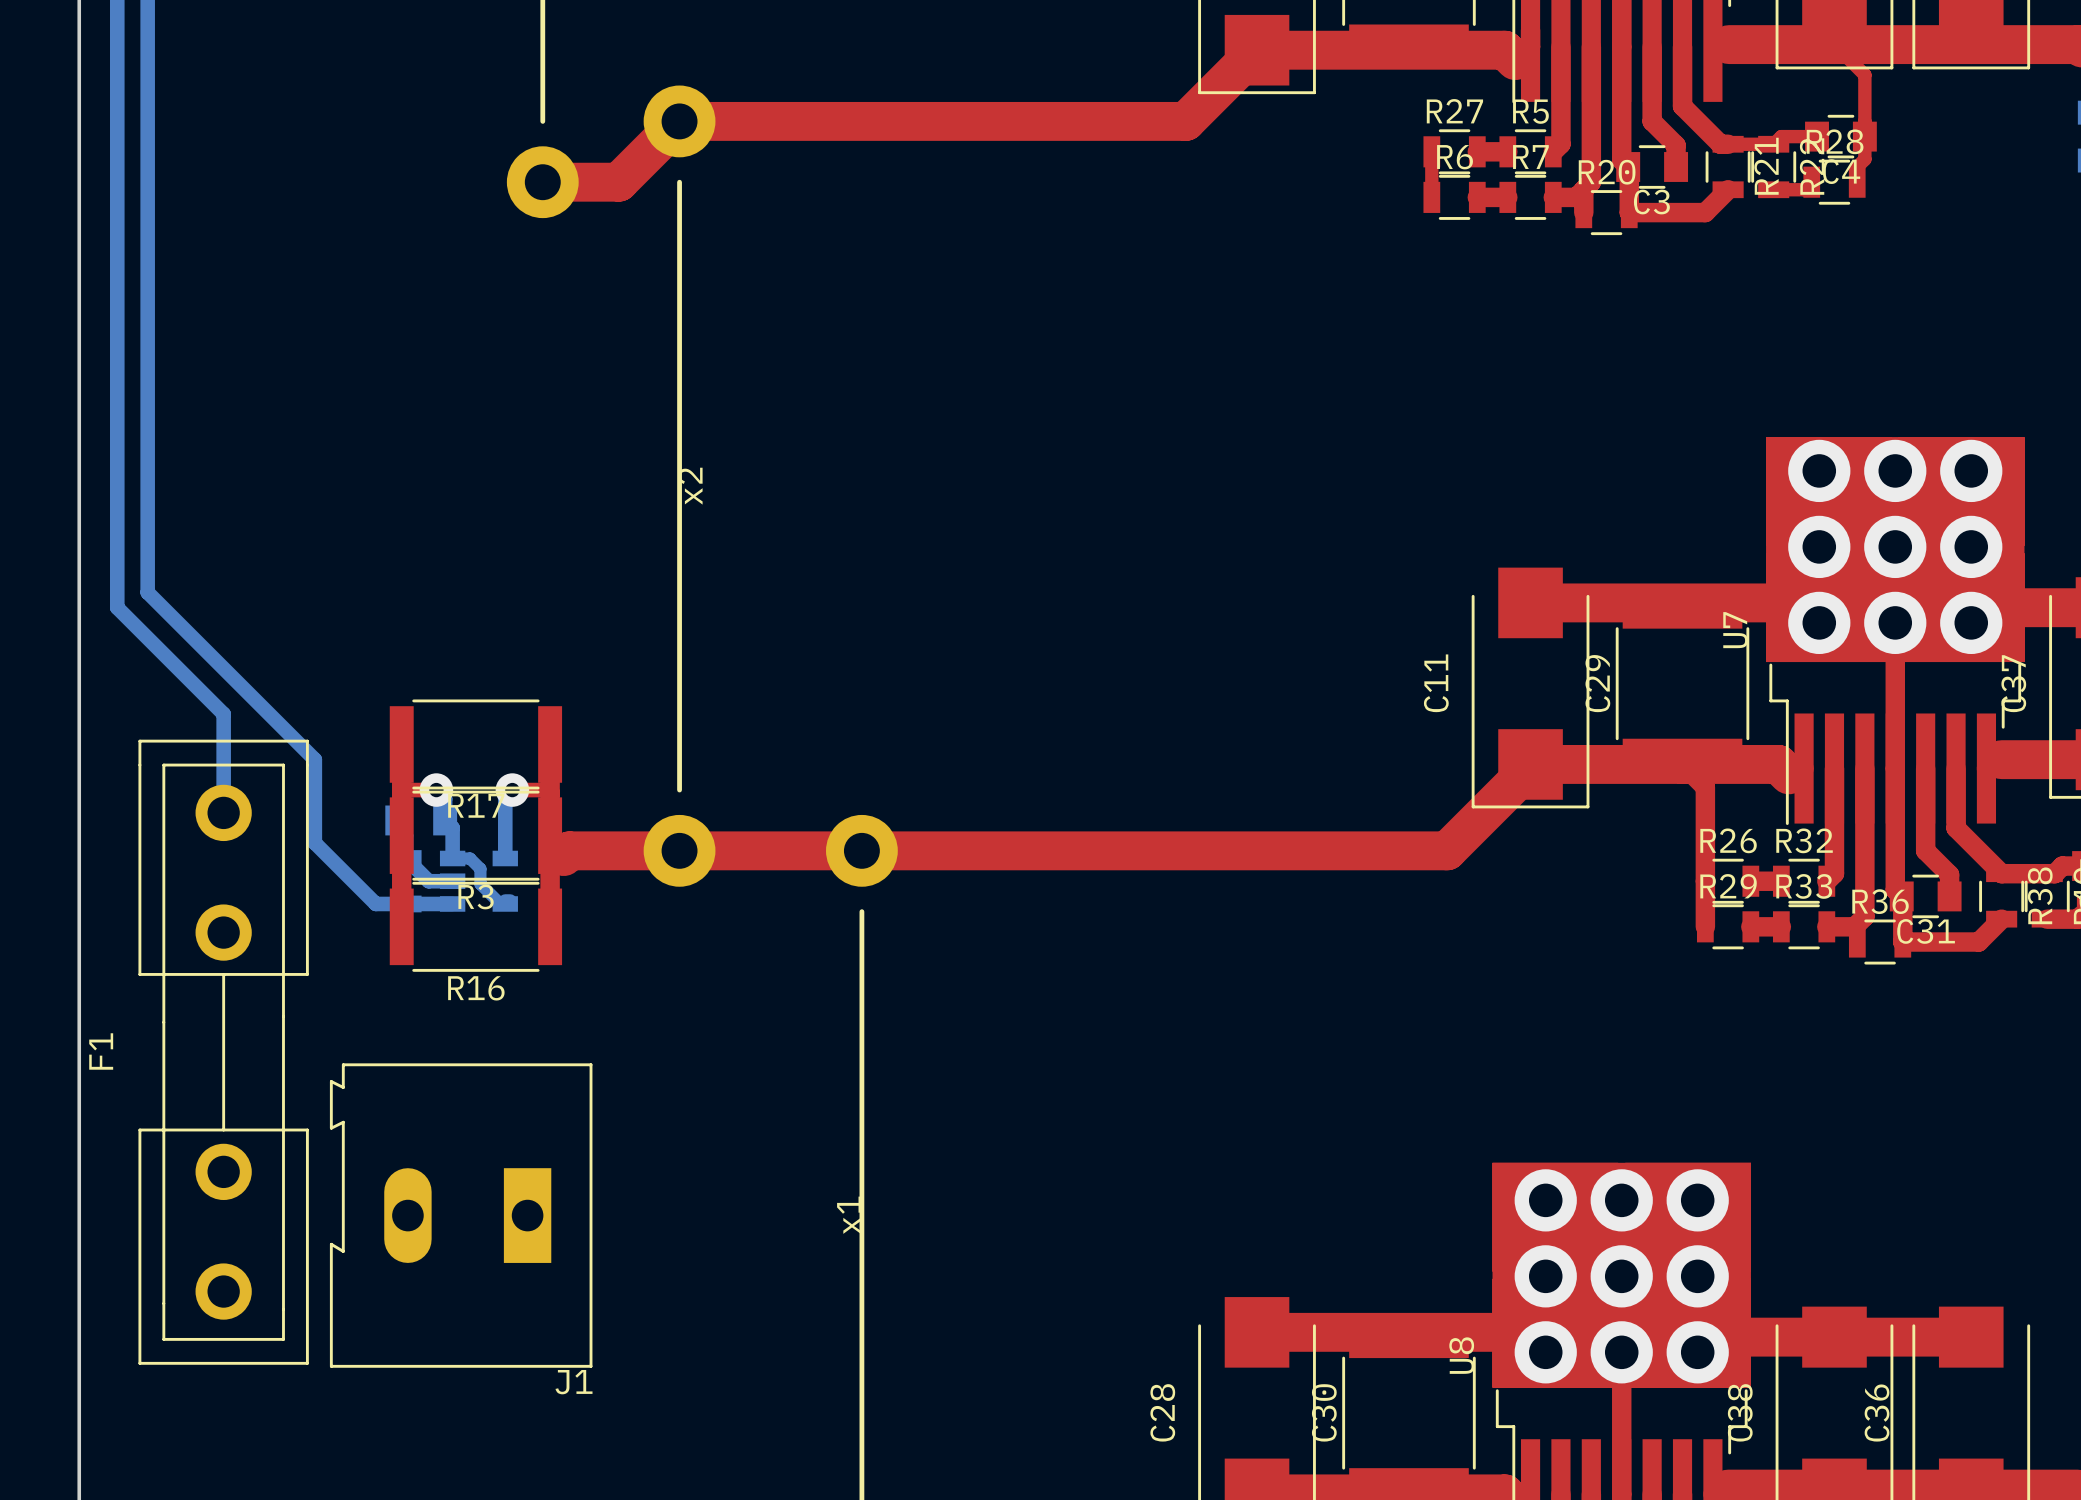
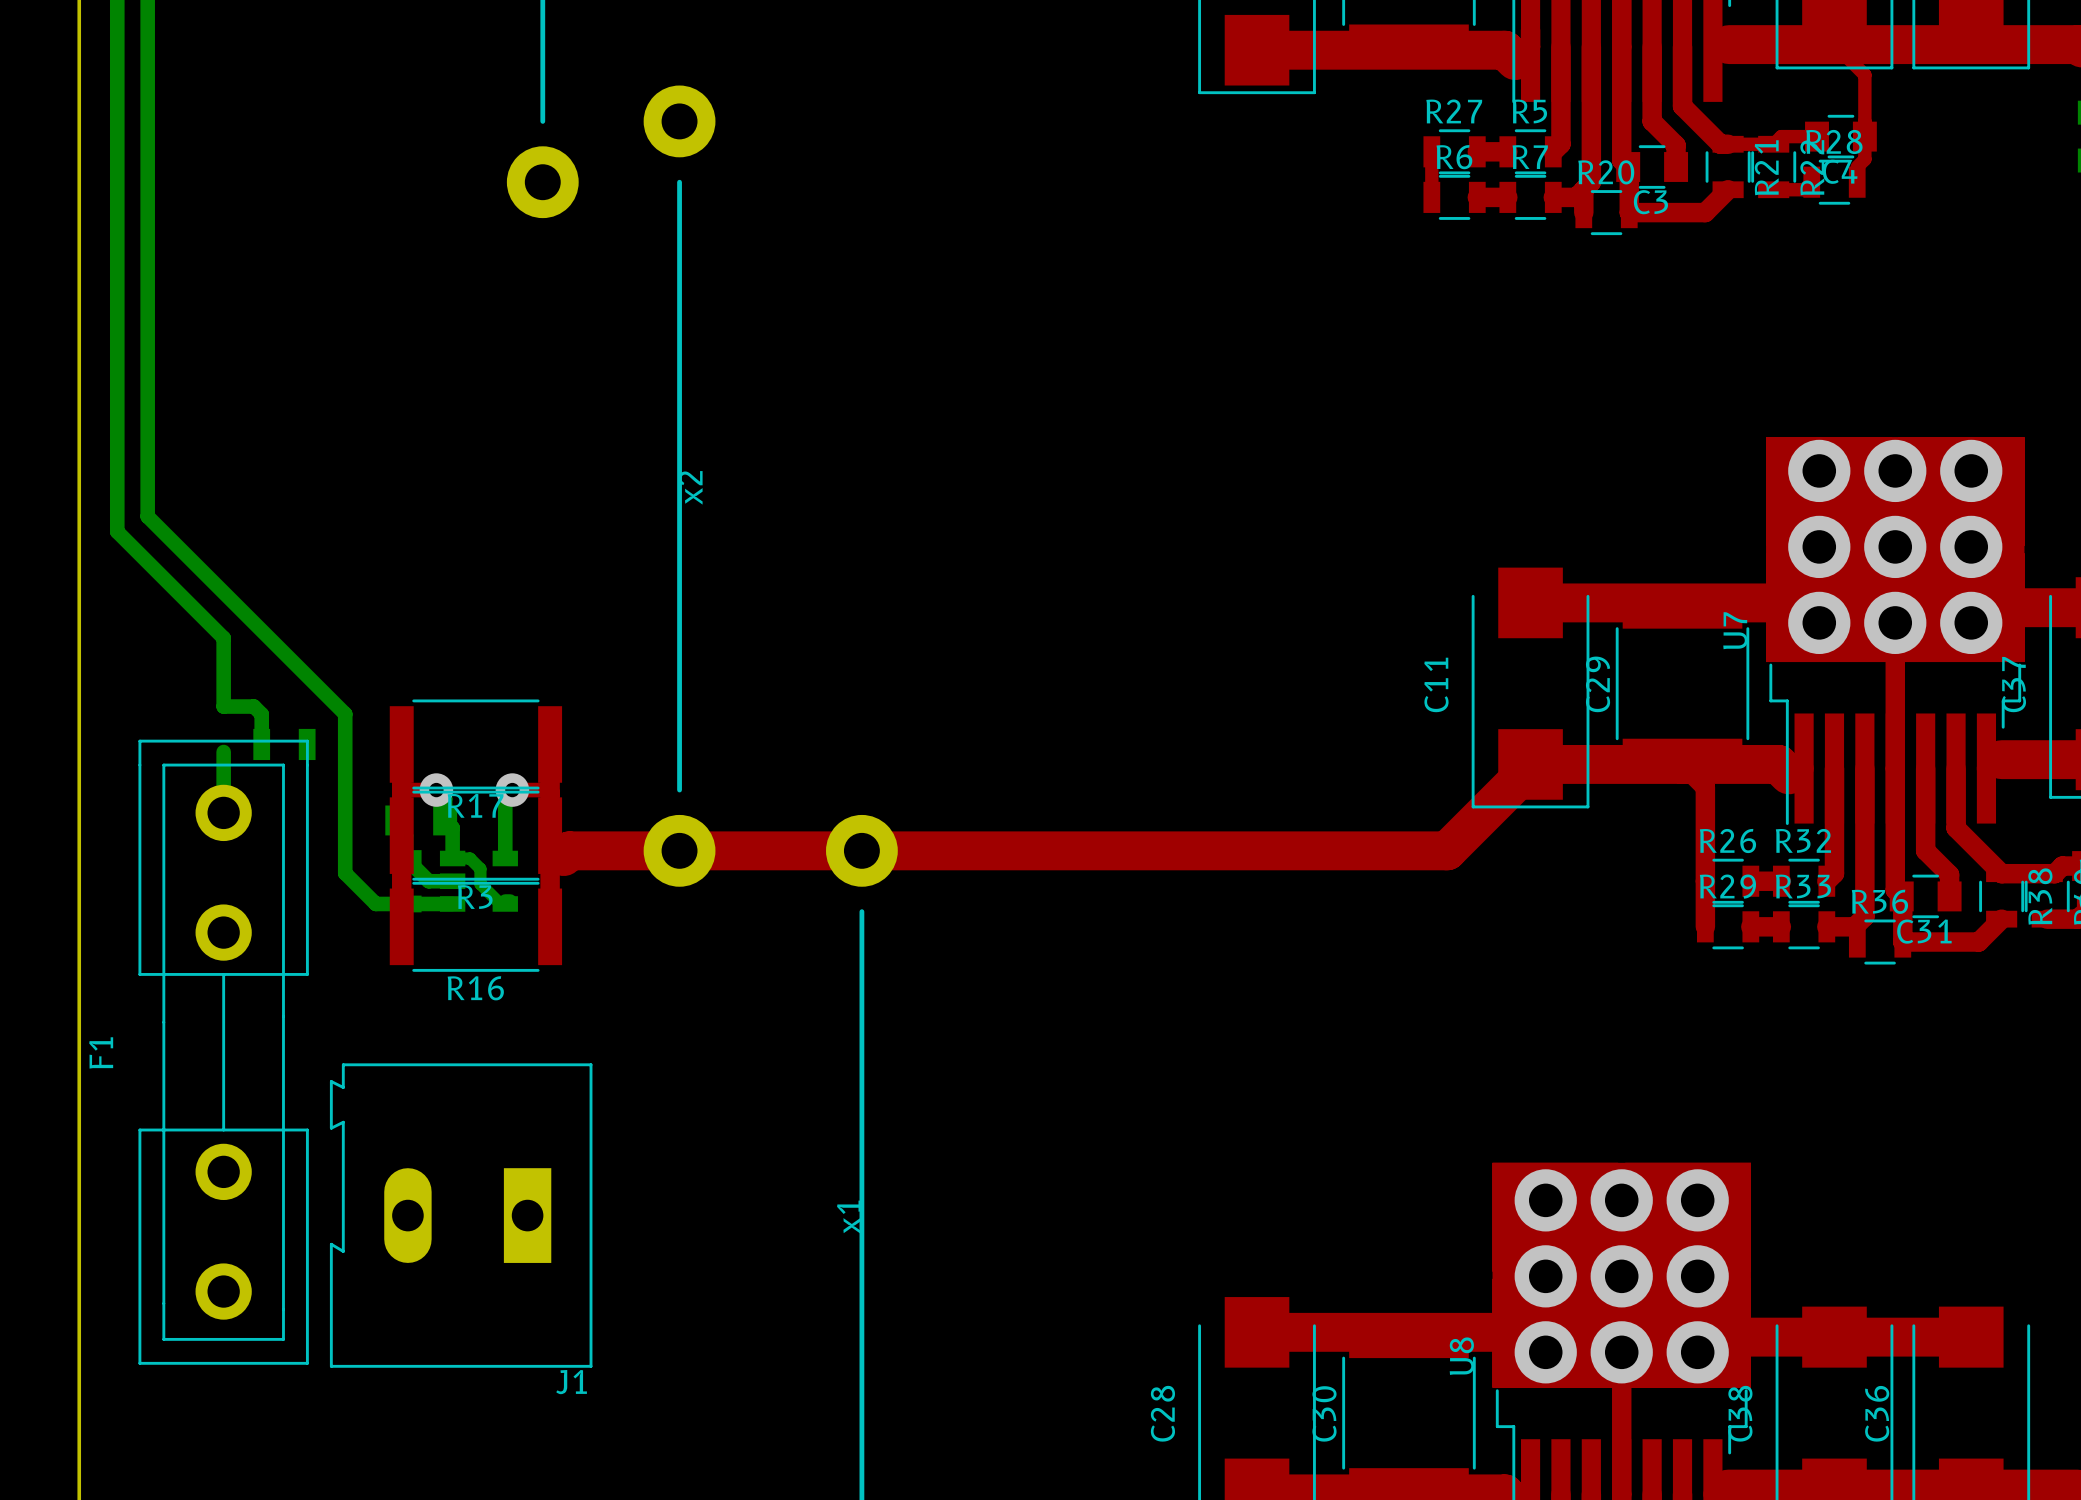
top track: (1257, 50) (1185, 121) (679, 121) (618, 182) (542, 182) -> none
bottom track: (147, 516) (147, 592) (314, 759) (314, 842) (345, 873) -> (147, 516) (345, 714) (345, 873)
bottom track: (117, 531) (117, 607) (223, 714) (223, 752) -> (117, 531) (223, 638) (223, 706) (253, 706) (261, 714) (261, 744)
part: none -> (284, 744)

